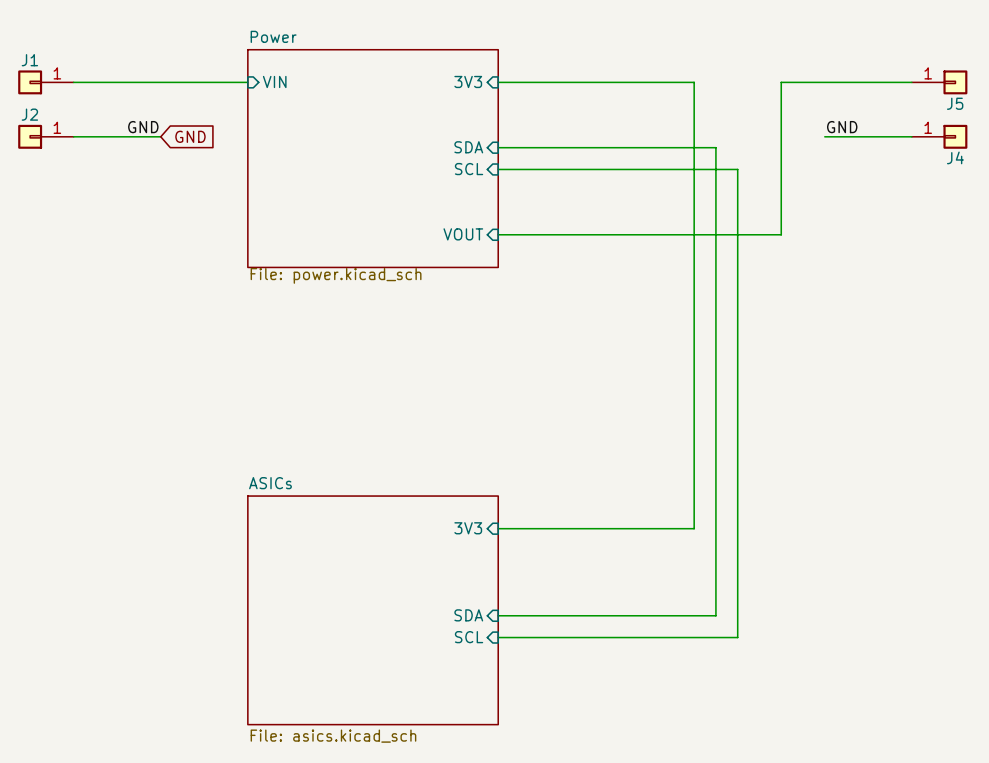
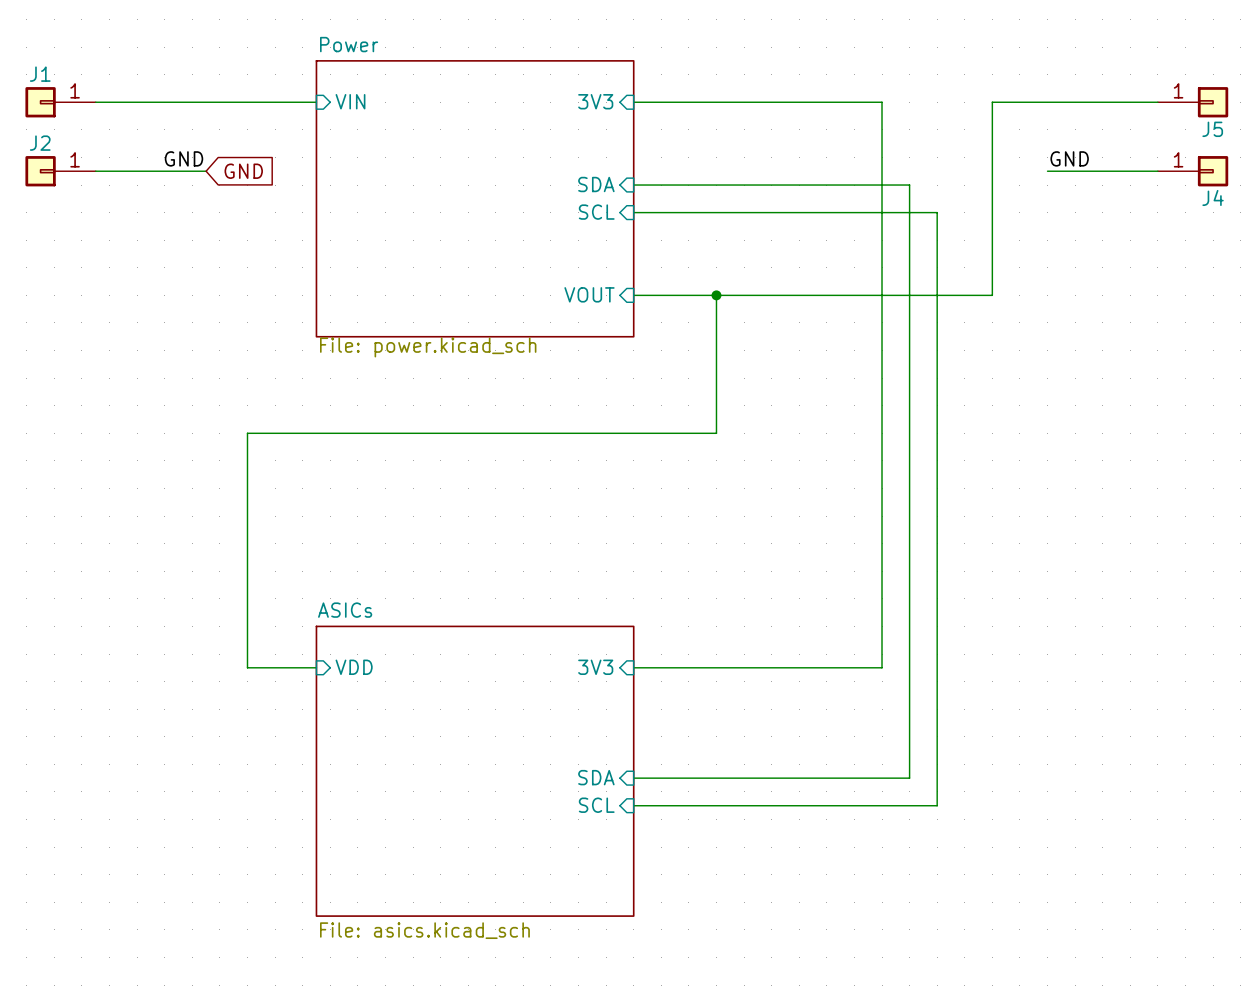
wire: none -> (716, 295) (716, 433) (247, 433) (247, 667) (316, 667)
junction: none -> (716, 295)
sheet pin: none -> VDD (354, 667)

